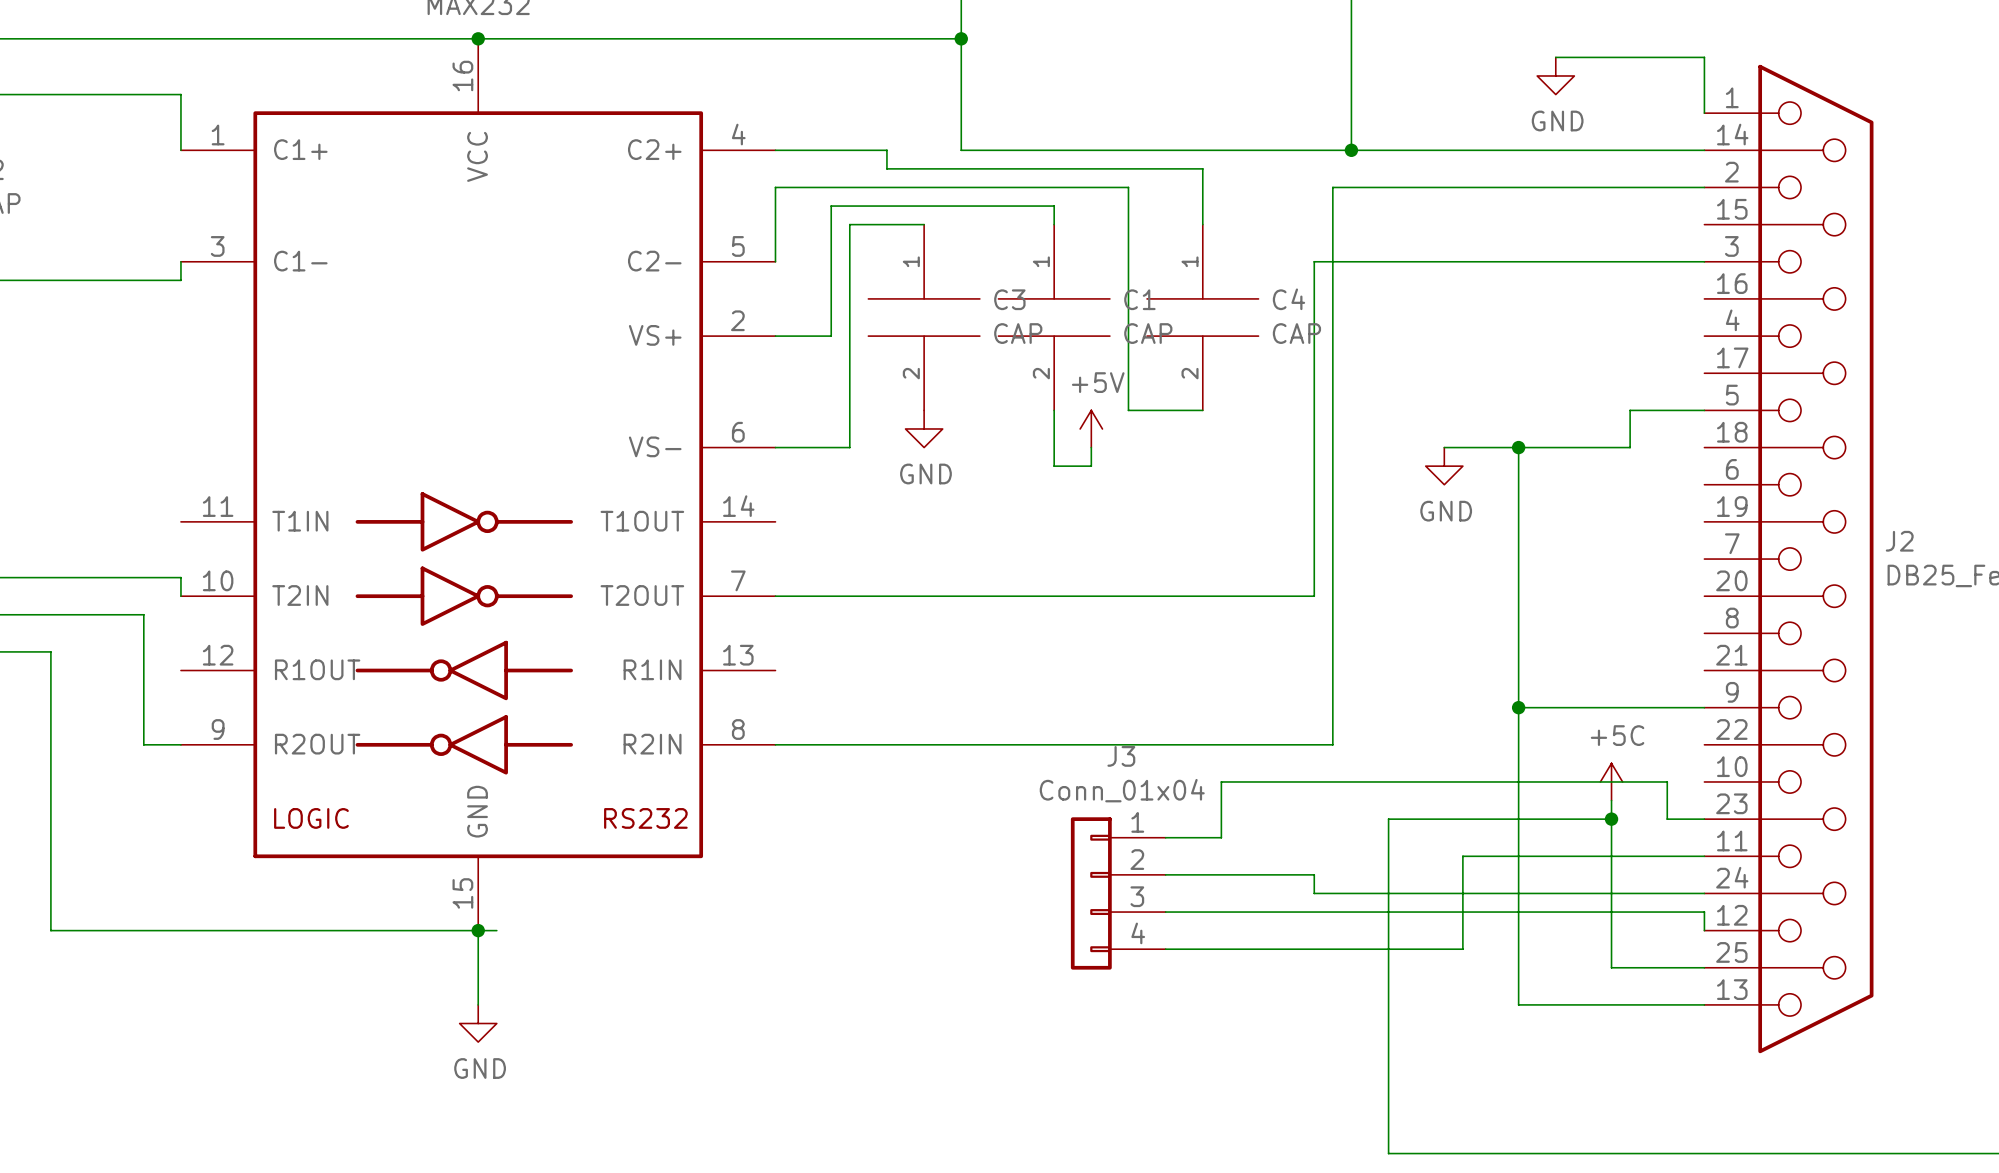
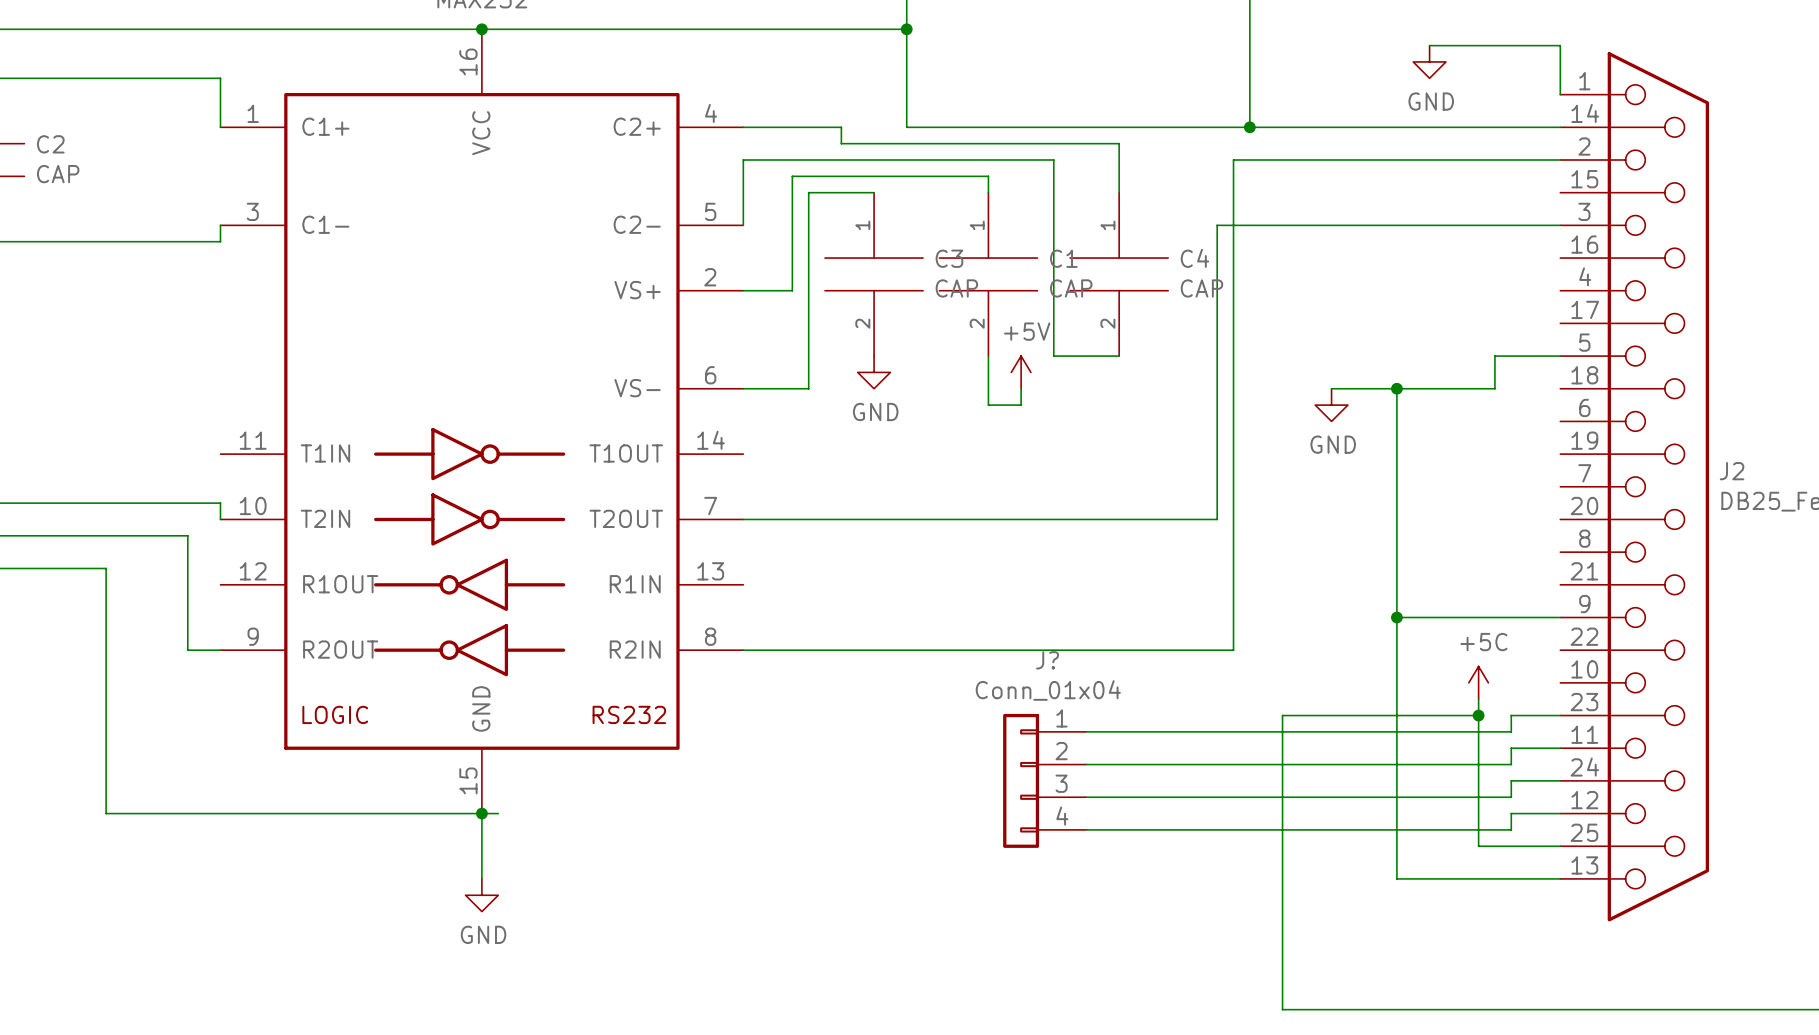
J3 name: J3 (1121, 756) -> J? (1047, 660)
wire: (1667, 819) (1667, 781) (1221, 781) (1221, 837) -> (1527, 715) (1511, 715) (1511, 731) (1135, 731)
wire: (1648, 856) (1462, 856) (1462, 949) -> (1560, 813) (1511, 813) (1511, 829) (1347, 829)
wire: (1314, 874) (1314, 893) (1648, 893) -> (1217, 764) (1511, 764) (1511, 748)
wire: (1648, 912) (1704, 912) (1704, 930) -> (1511, 797) (1511, 780)

